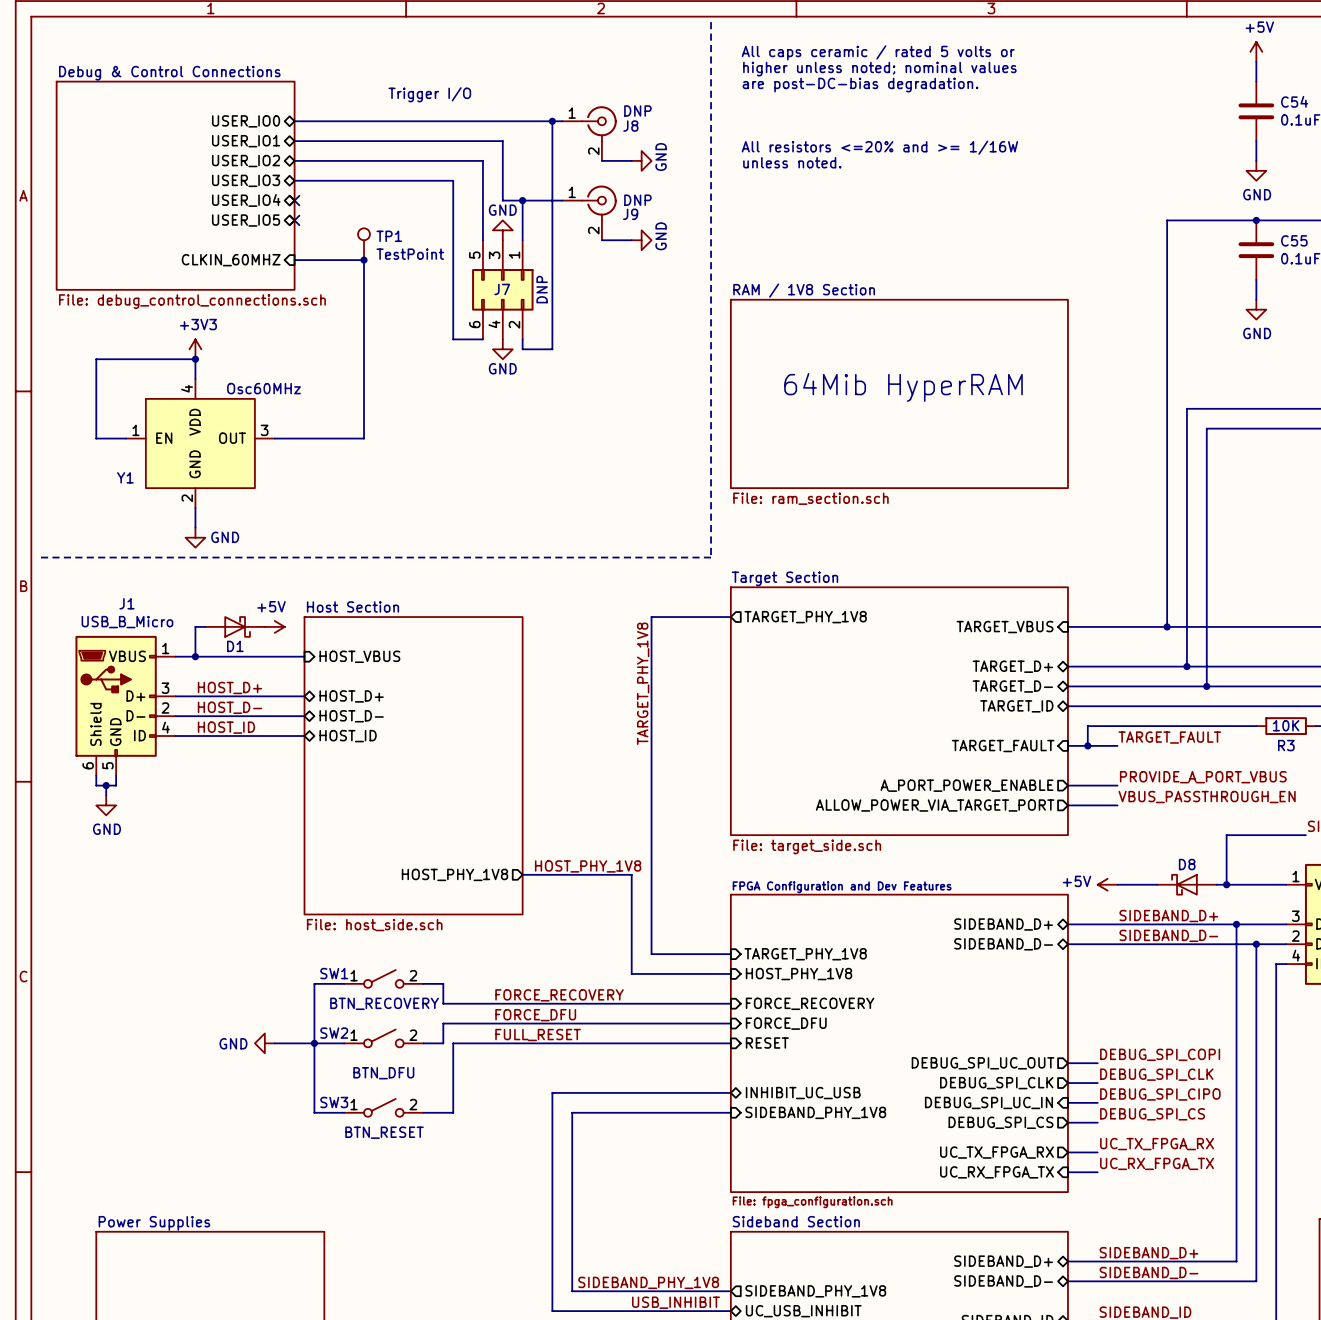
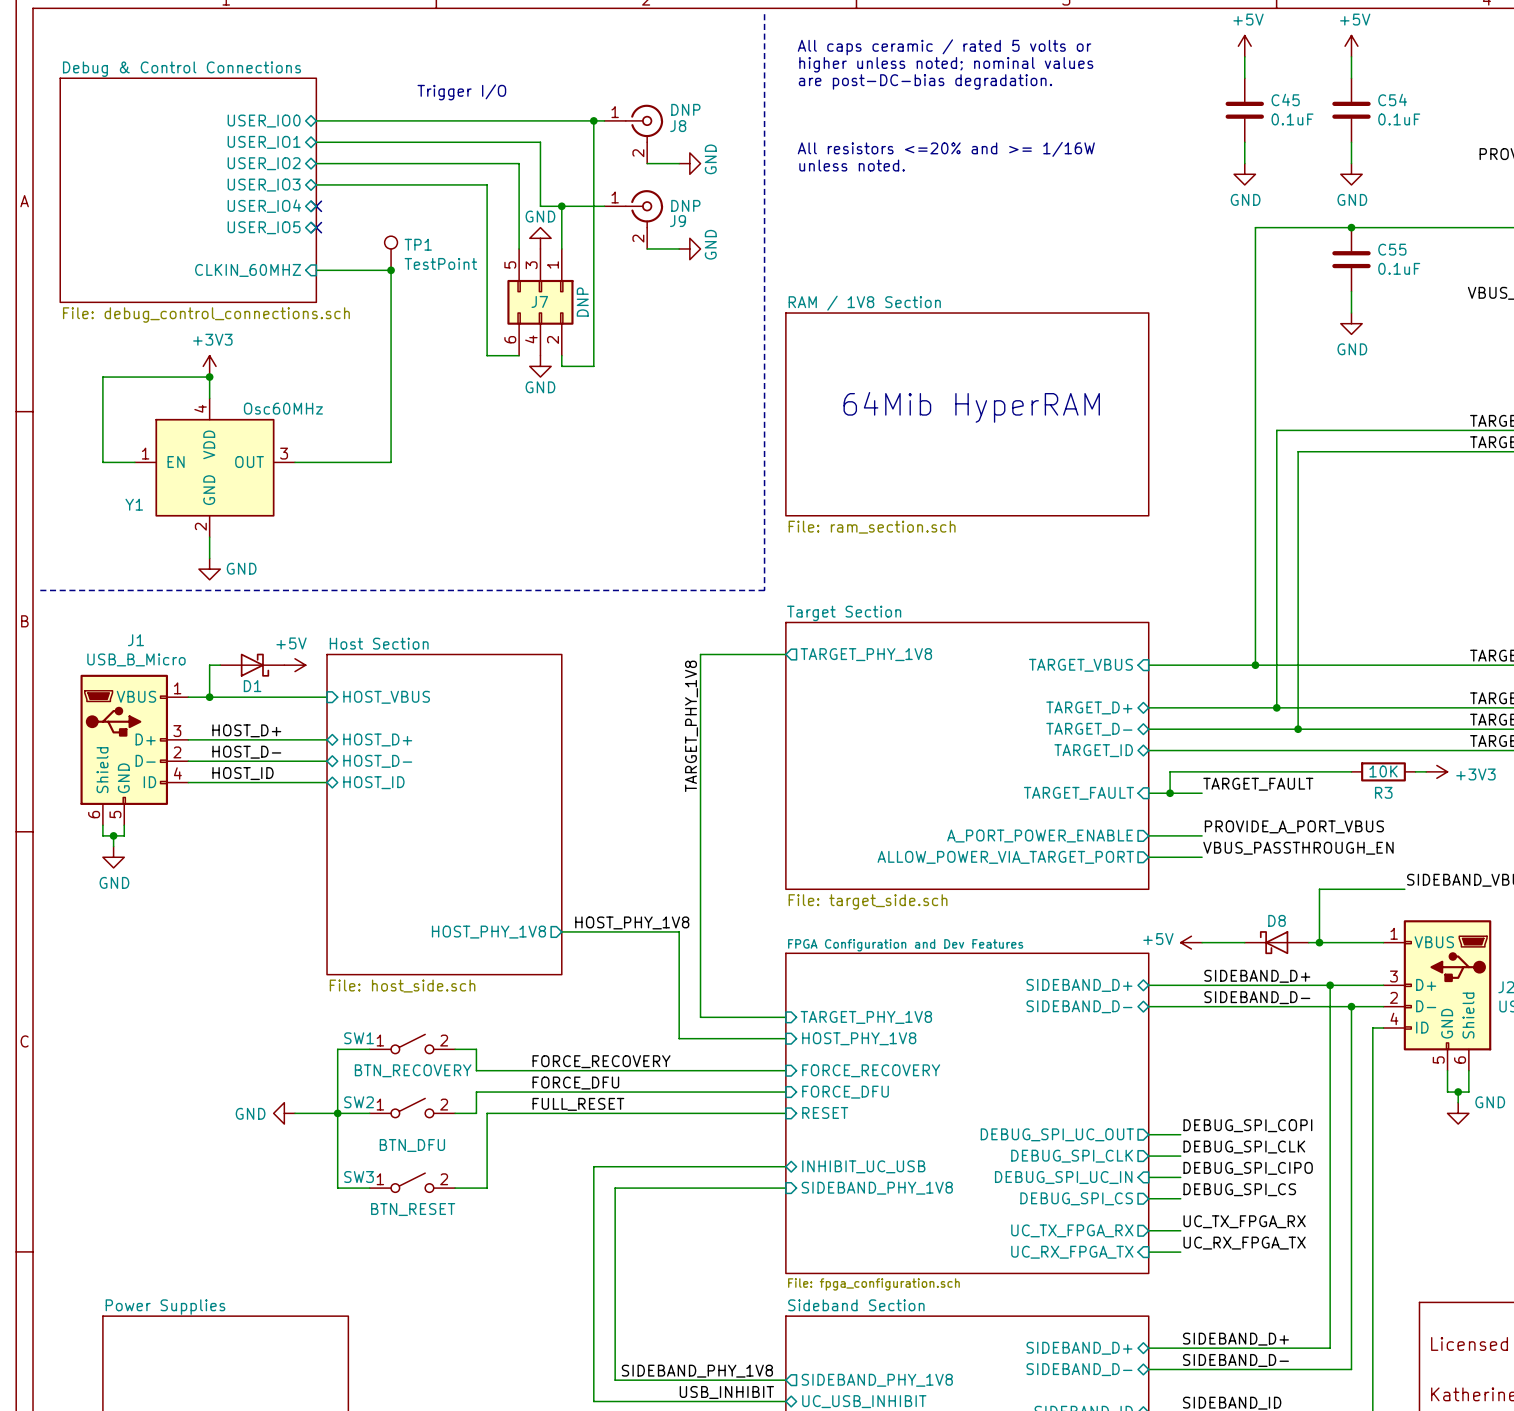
power symbol: none -> +5V (1244, 46)
wire: none -> (1244, 56) (1244, 78)
C45: none -> 0.1uF (1244, 110)
wire: none -> (1244, 142) (1244, 163)
power symbol: none -> GND (1244, 174)

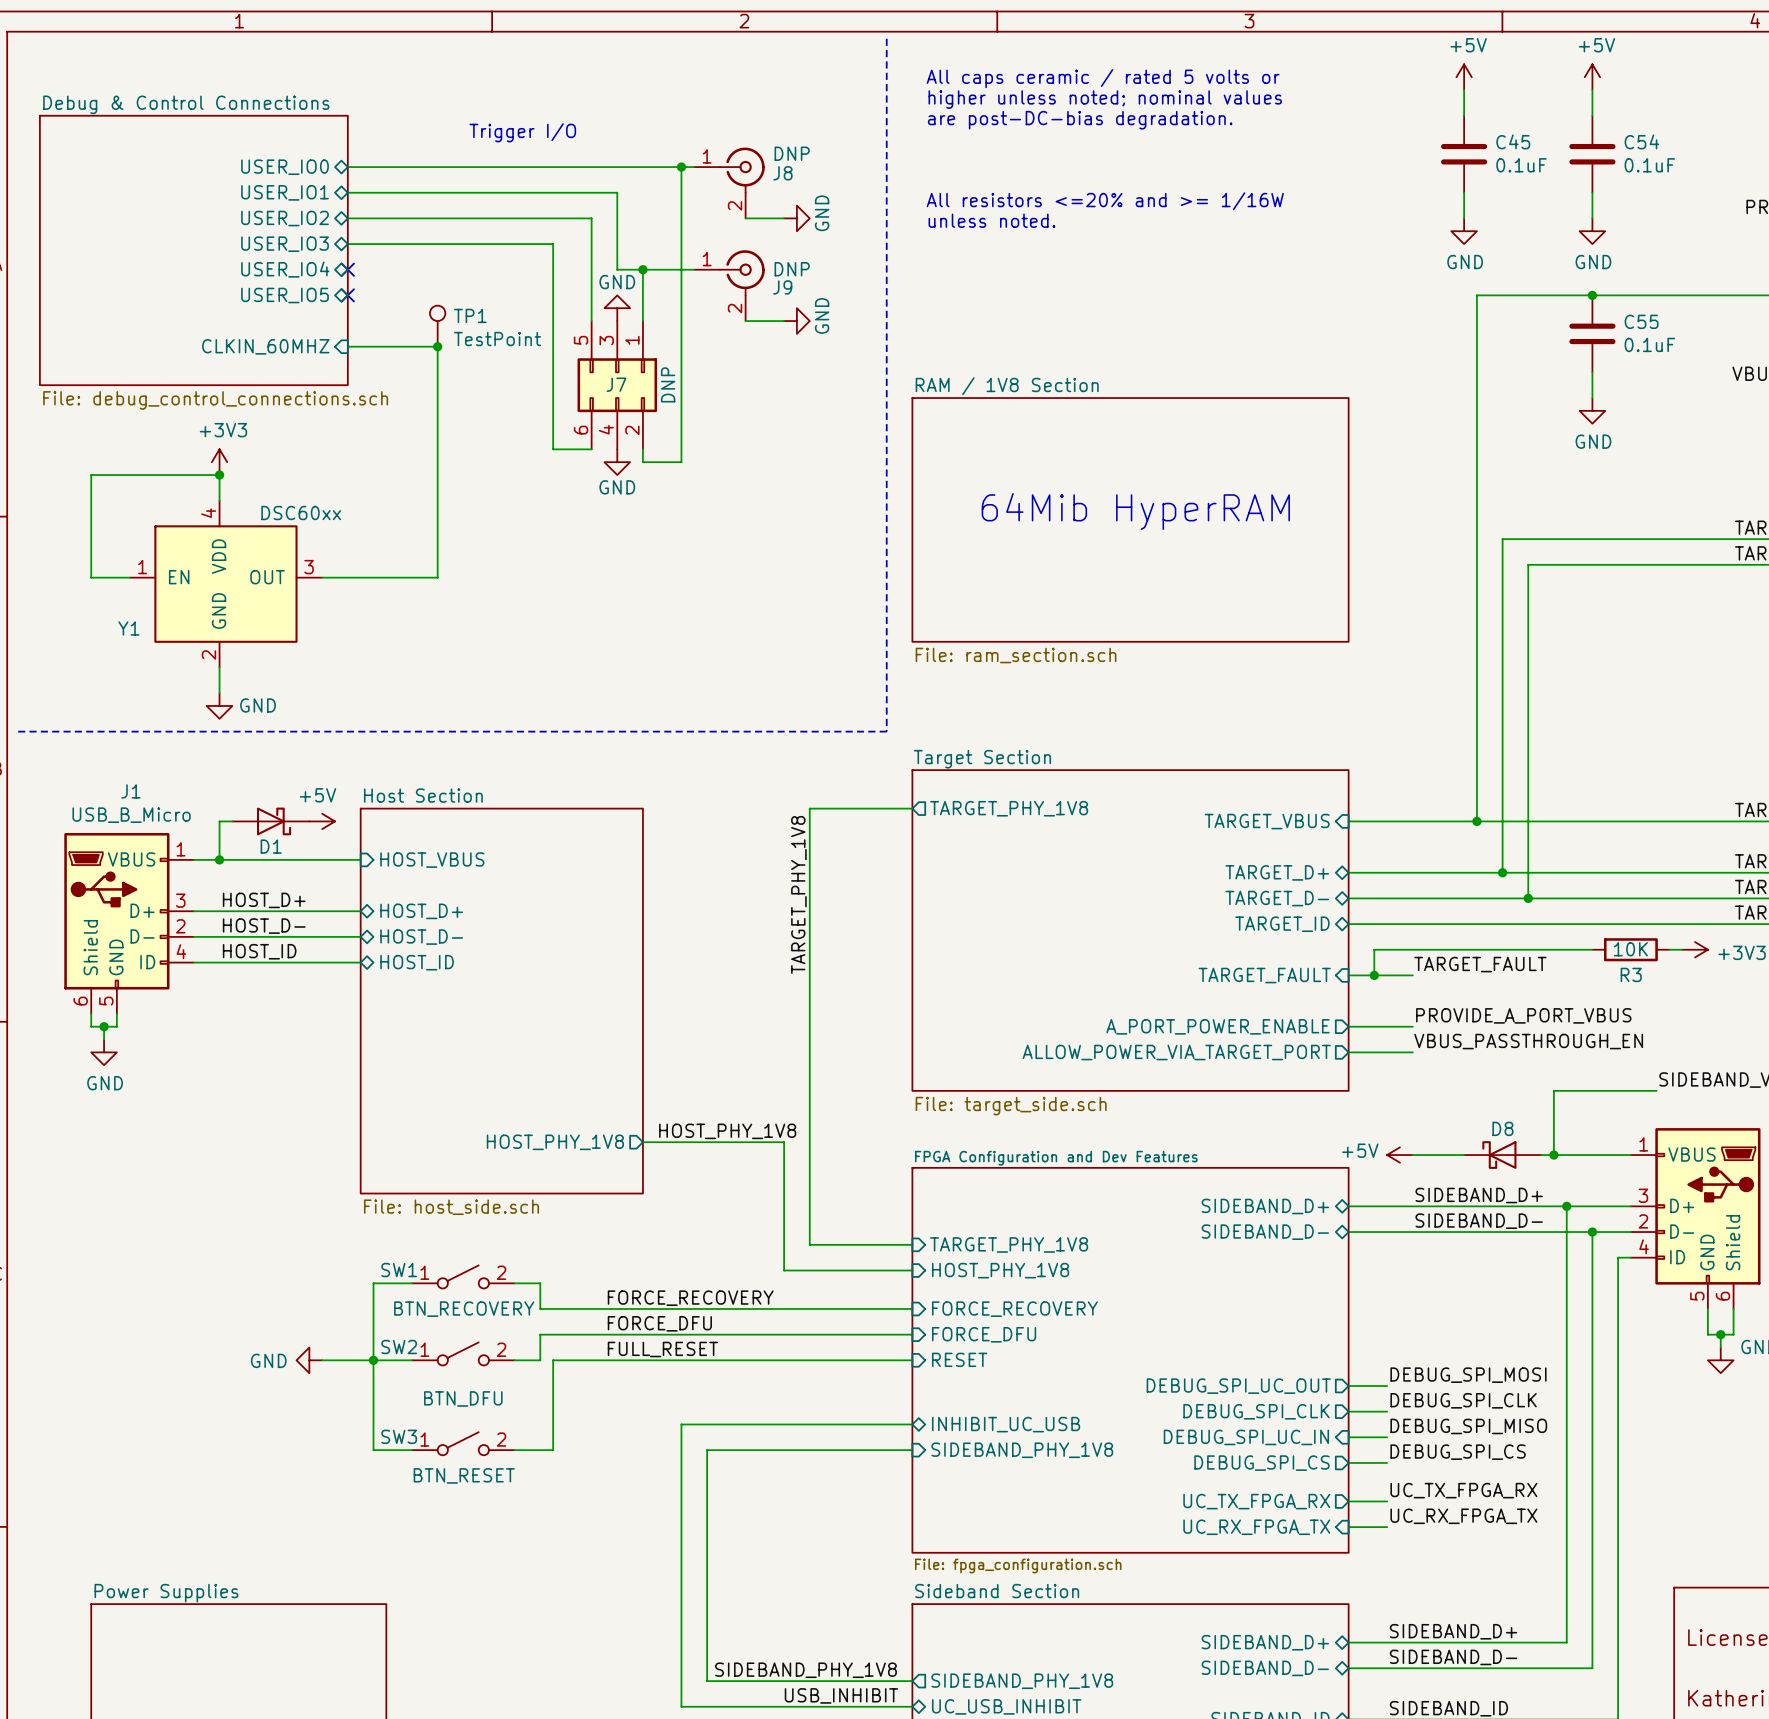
Y1 value: Osc60MHz (283, 408) -> DSC60xx (301, 513)
label: DEBUG_SPI_COPI (1247, 1125) -> DEBUG_SPI_MOSI (1468, 1375)
label: DEBUG_SPI_CIPO (1248, 1168) -> DEBUG_SPI_MISO (1468, 1426)

